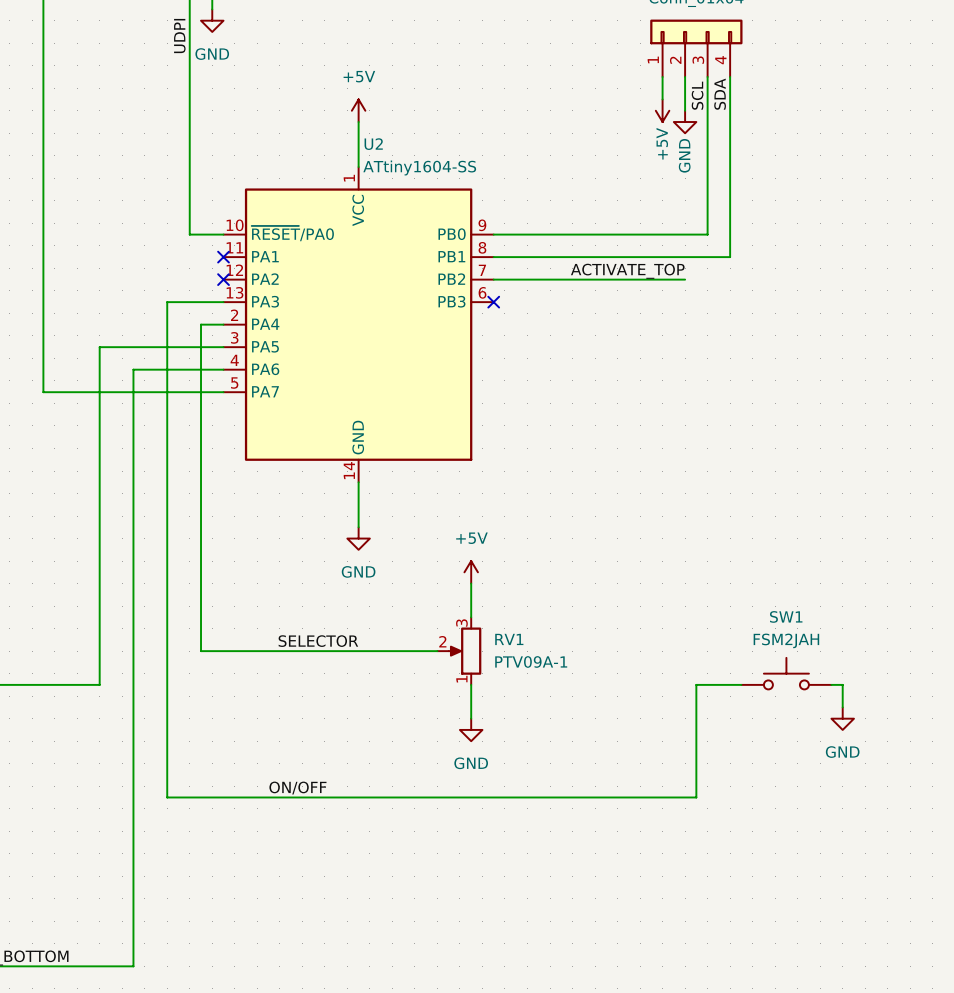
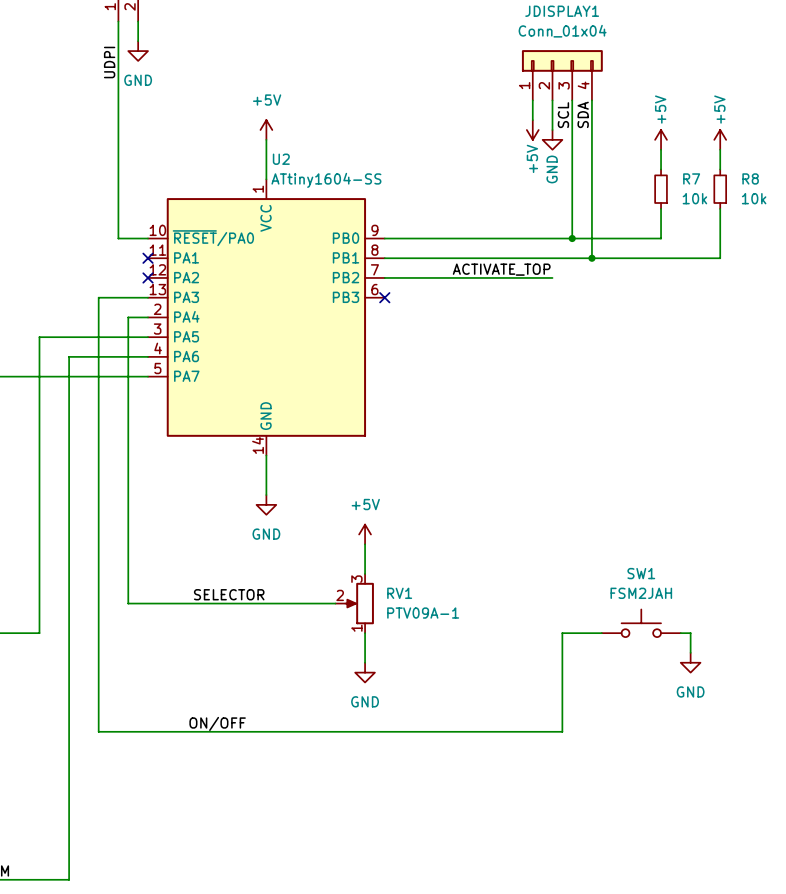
power symbol: none -> +5V (661, 139)
power symbol: none -> +5V (720, 139)
wire: none -> (661, 149) (661, 169)
wire: none -> (720, 149) (720, 169)
R7: none -> 10k (661, 189)
R8: none -> 10k (720, 189)
wire: none -> (661, 208) (661, 238) (572, 238)
wire: none -> (720, 208) (720, 258) (591, 258)
junction: none -> (572, 238)
junction: none -> (591, 258)

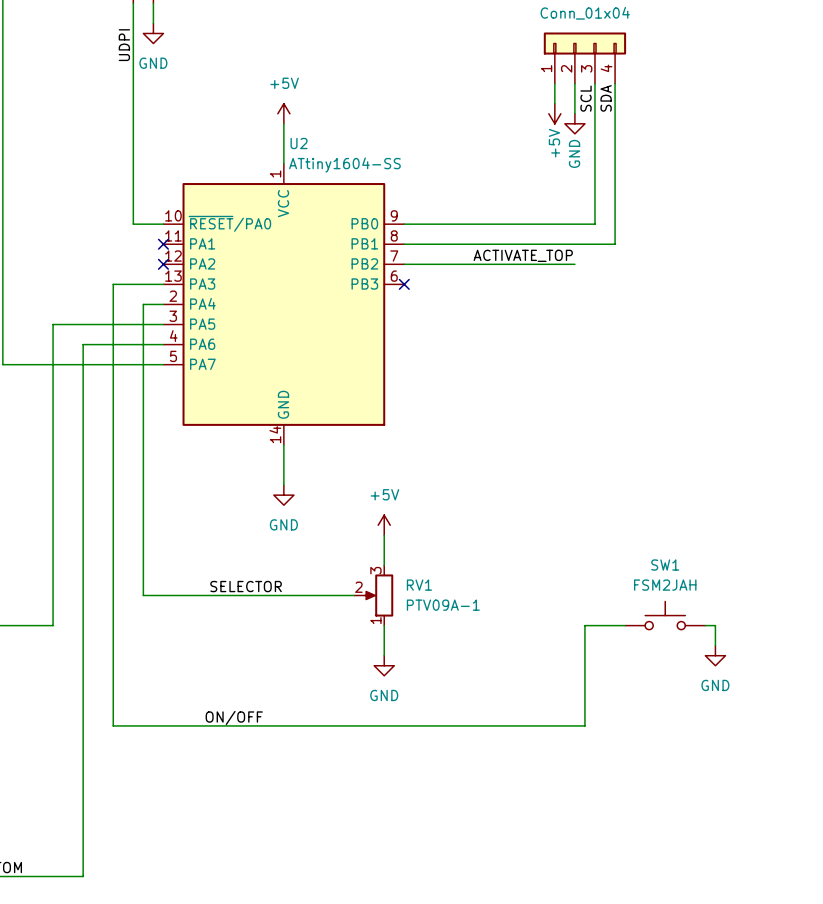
power symbol: +5V (661, 139) -> none
power symbol: +5V (720, 139) -> none
wire: (661, 149) (661, 169) -> none
wire: (720, 149) (720, 169) -> none
R7: 10k (661, 189) -> none
R8: 10k (720, 189) -> none
wire: (661, 208) (661, 238) (572, 238) -> none
wire: (720, 208) (720, 258) (591, 258) -> none
junction: (572, 238) -> none
junction: (591, 258) -> none

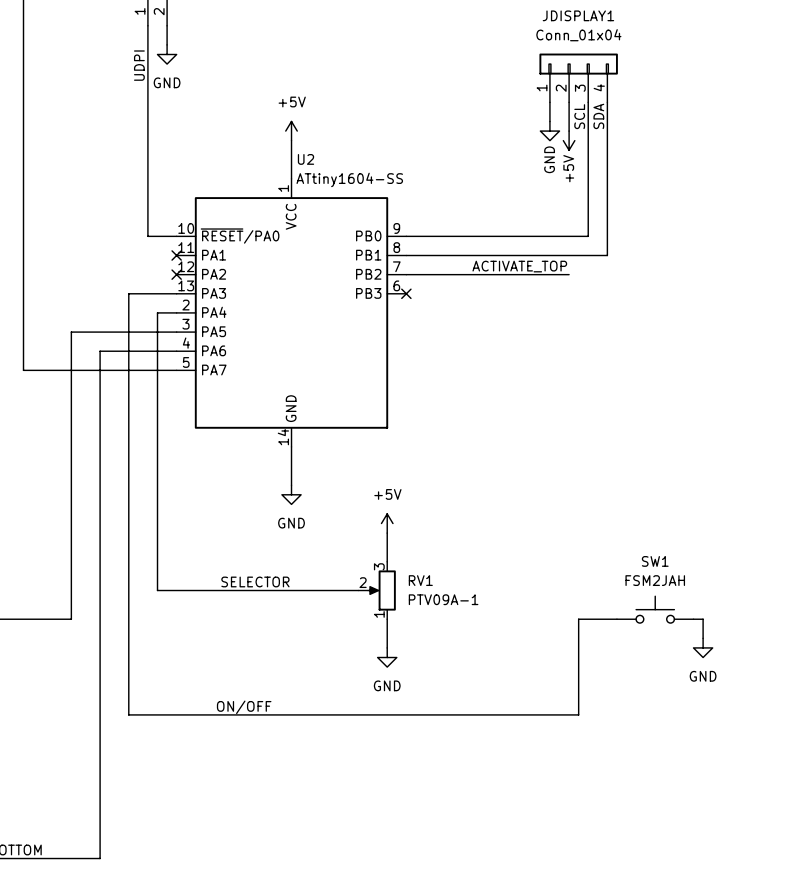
power symbol: +5V (554, 113) -> GND (549, 131)
power symbol: GND (574, 123) -> +5V (569, 140)

